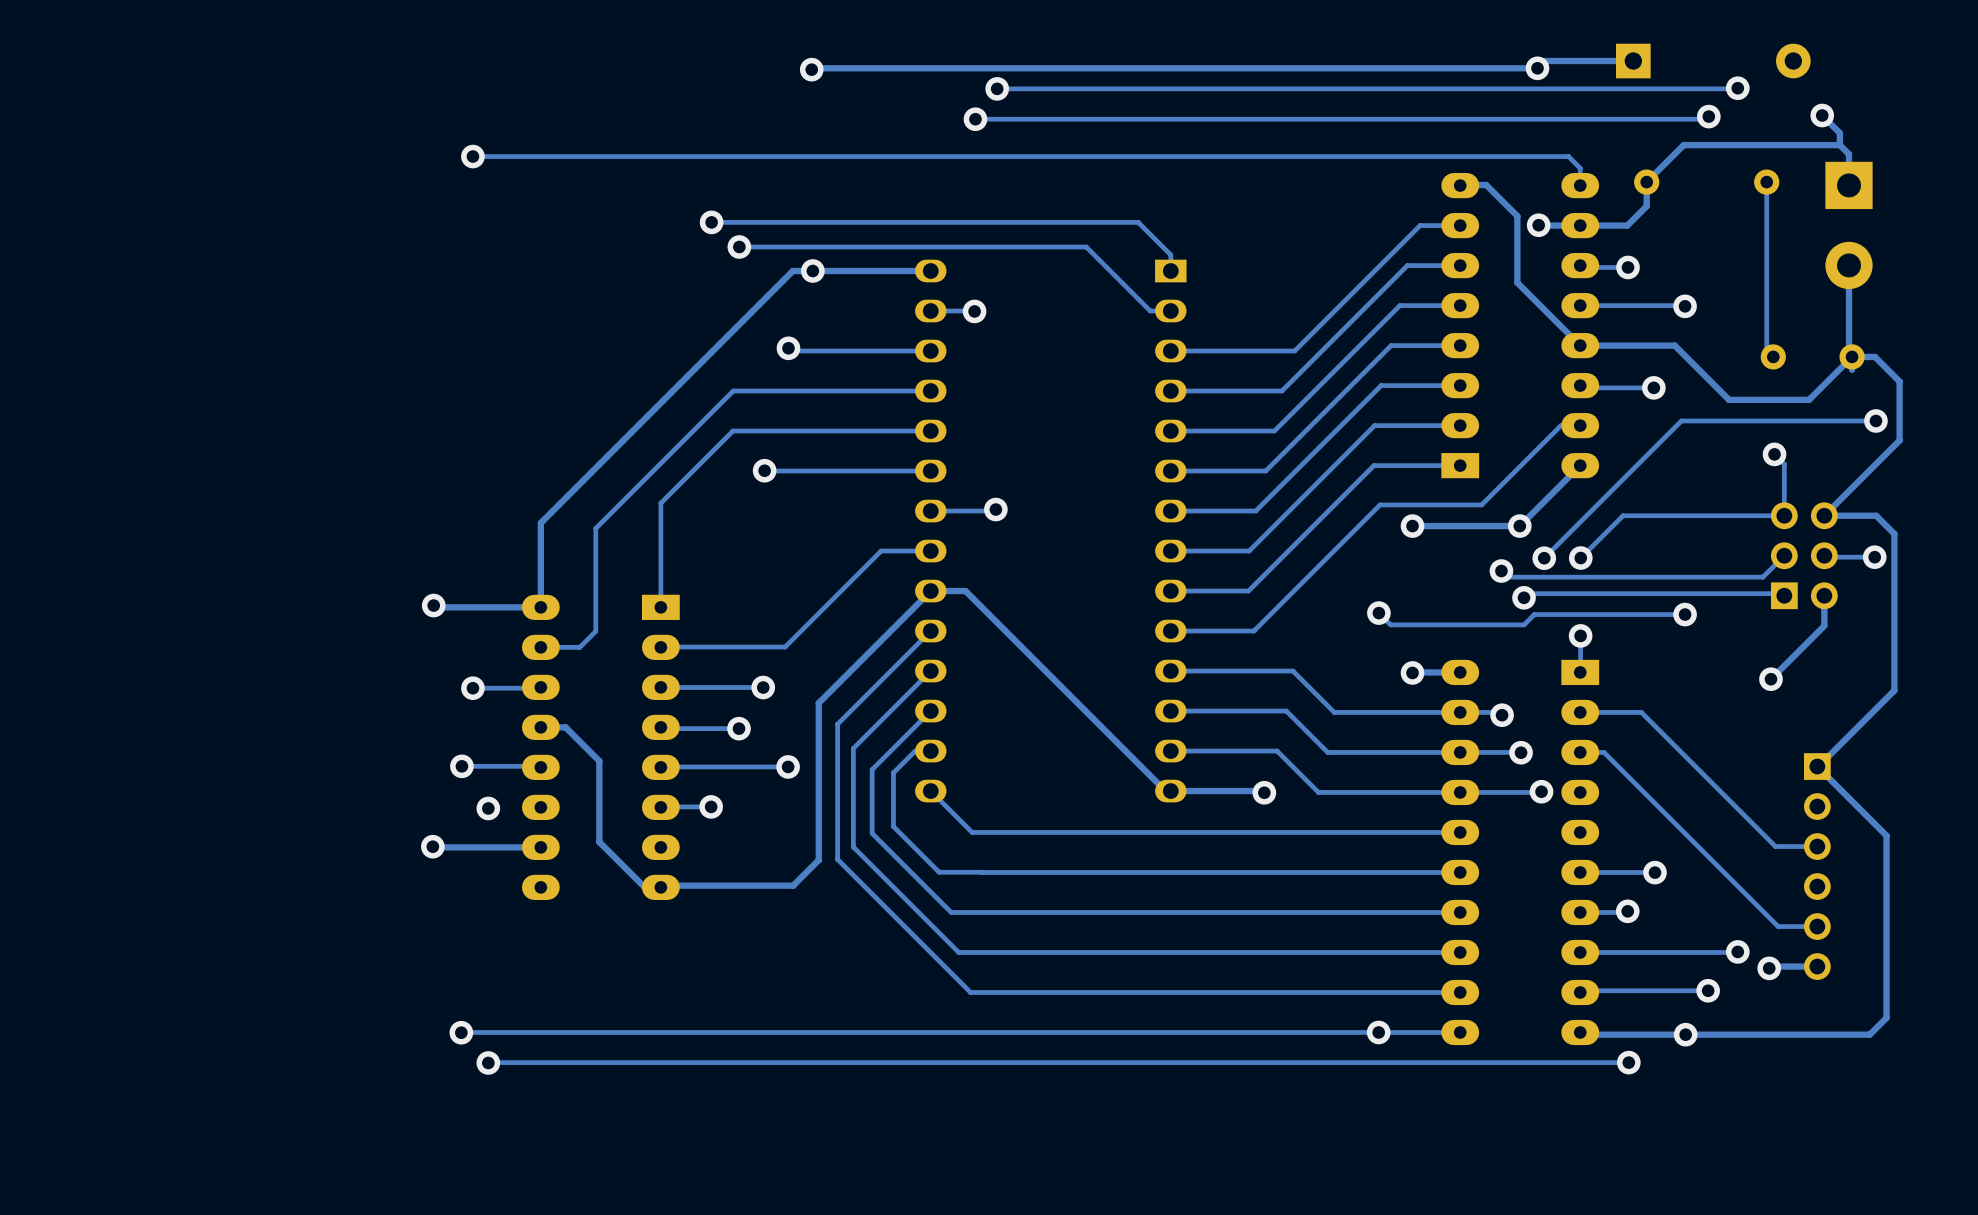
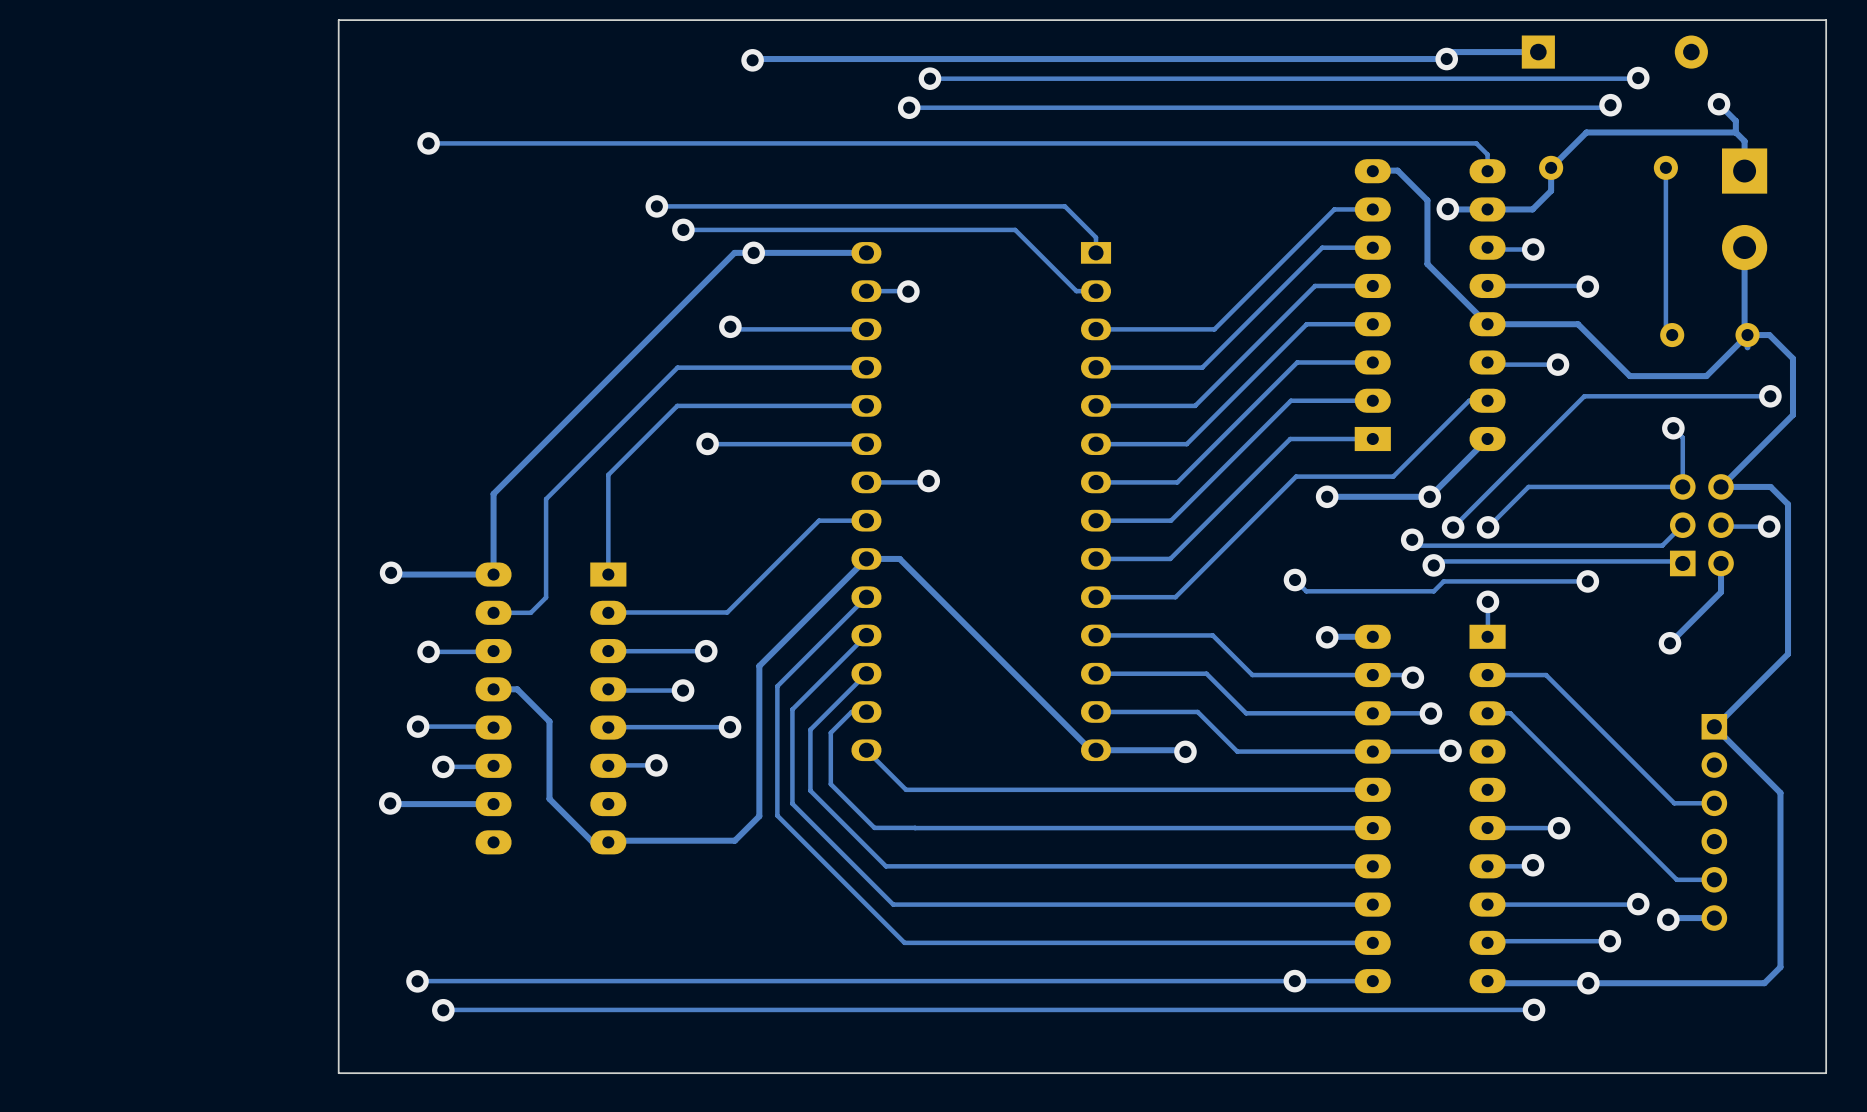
board edge: none -> (1826, 20) (338, 20) (338, 1073) (1826, 1073) (1826, 20)
track: none -> (493, 765) (443, 766)

